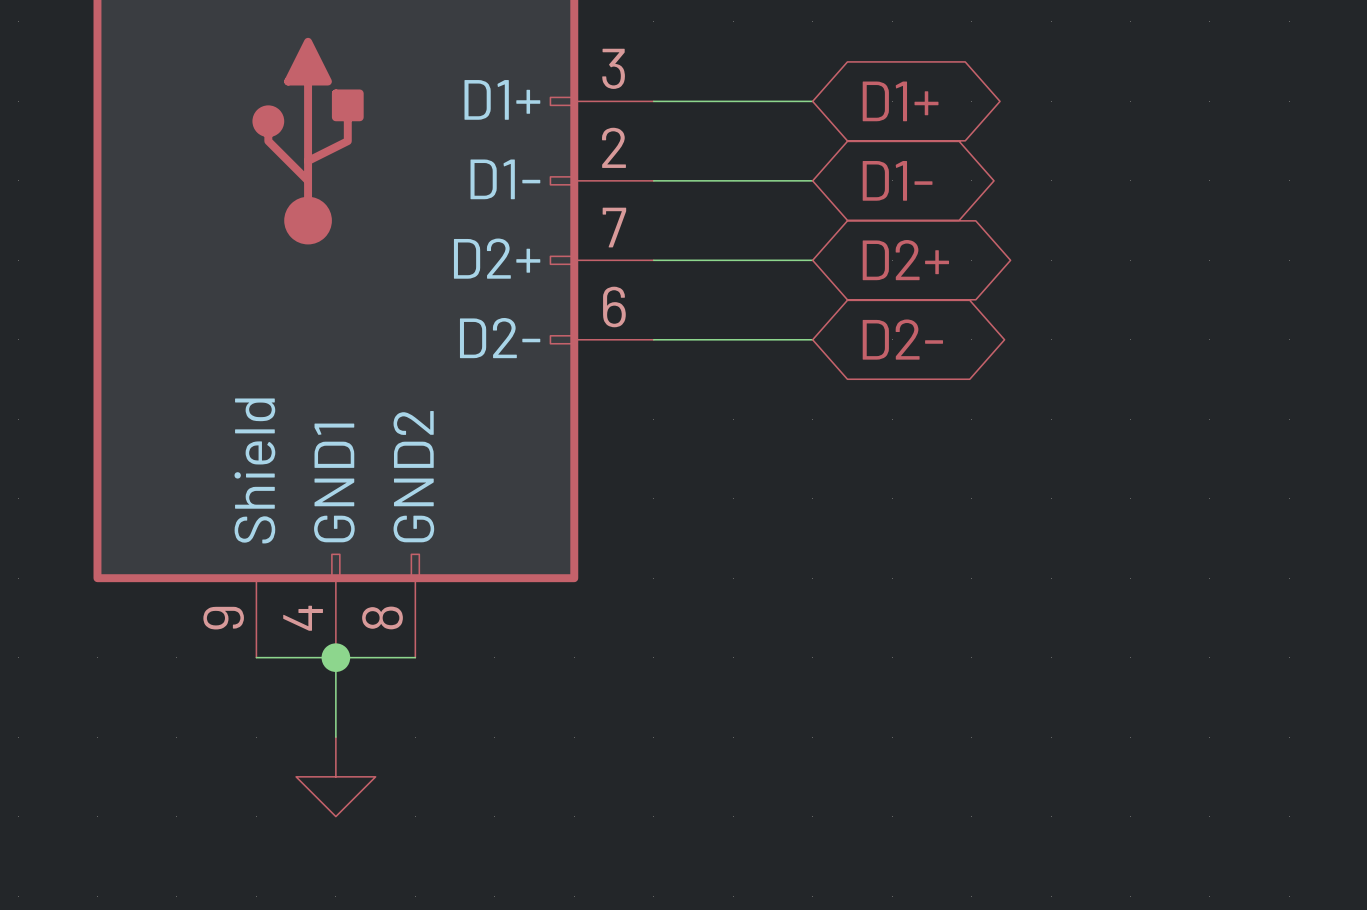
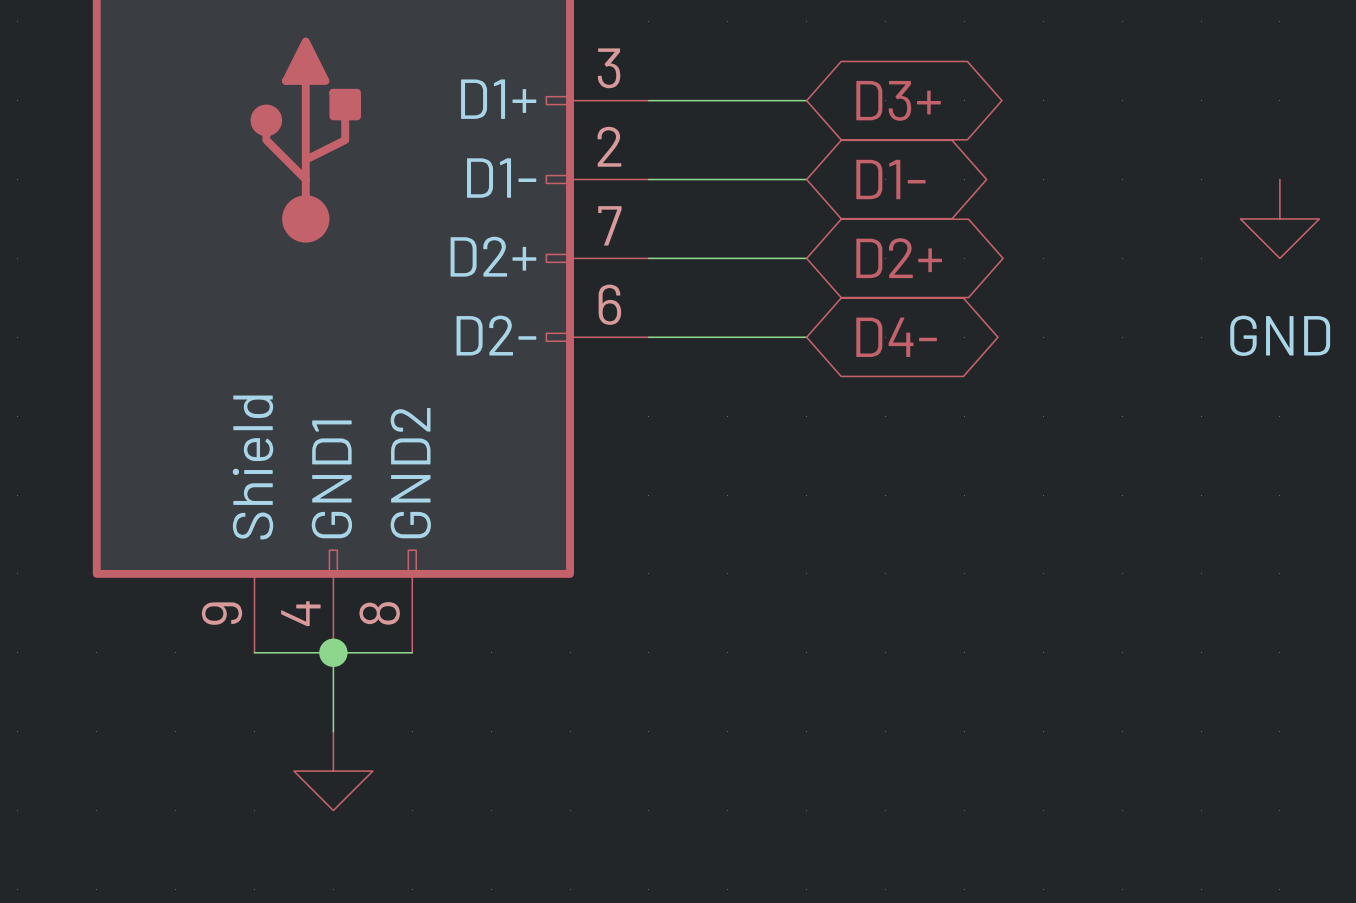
global label: D1+ (900, 101) -> D3+ (898, 100)
power symbol: none -> GND (1279, 218)
global label: D2- (902, 339) -> D4- (896, 337)

